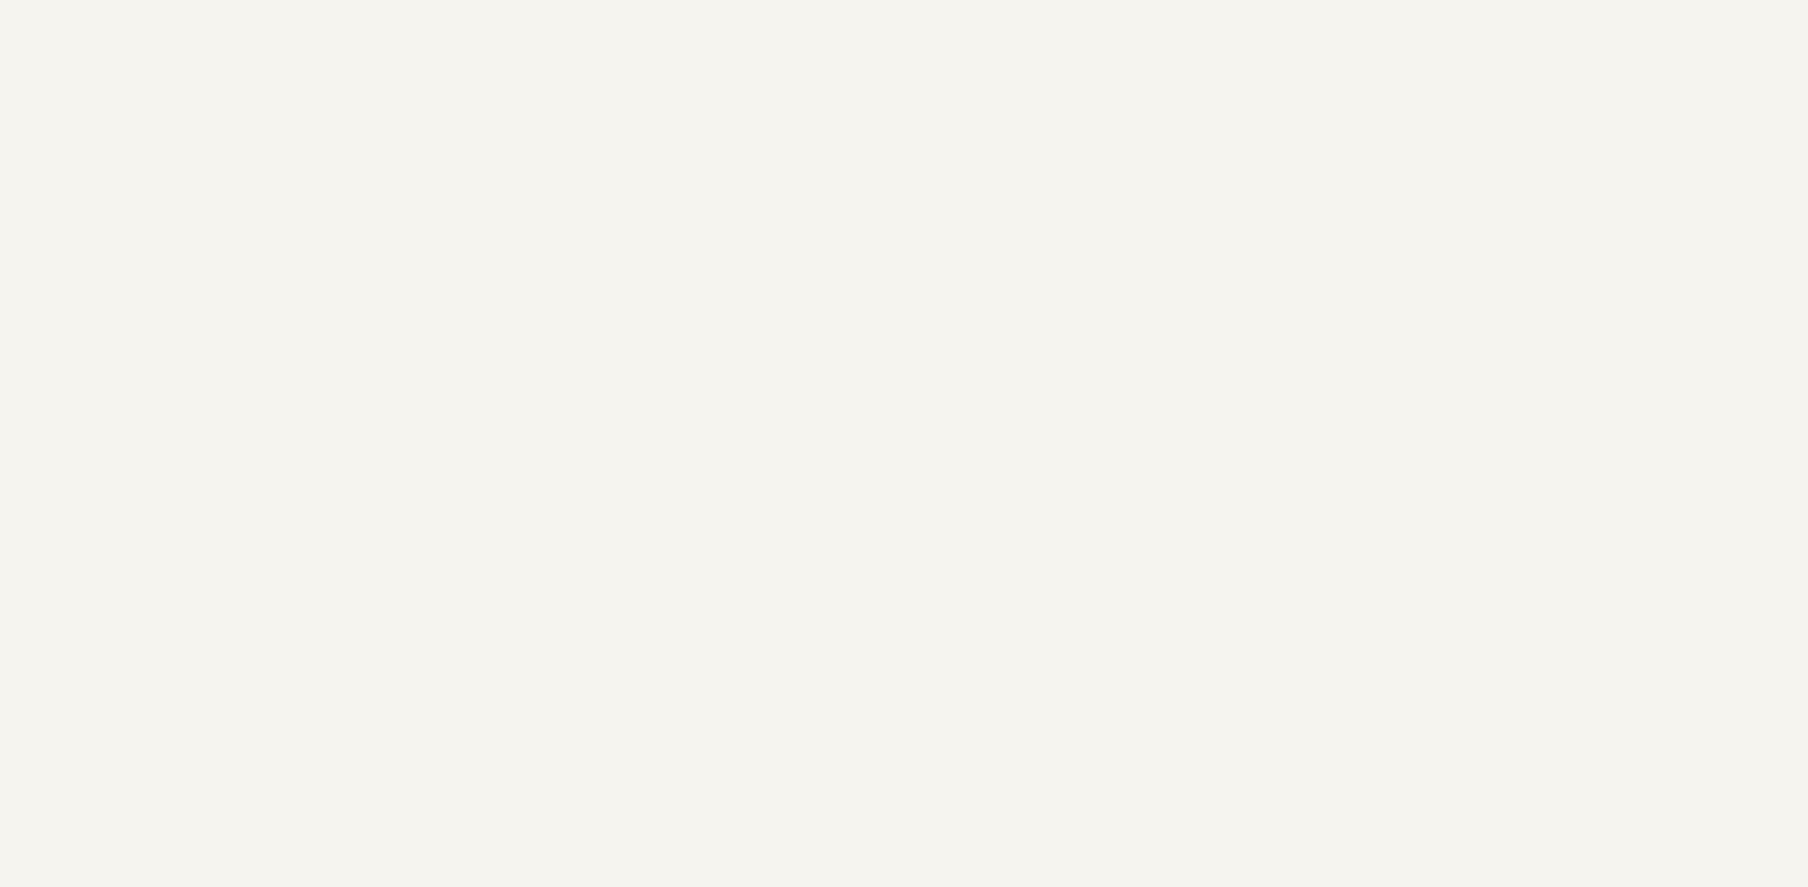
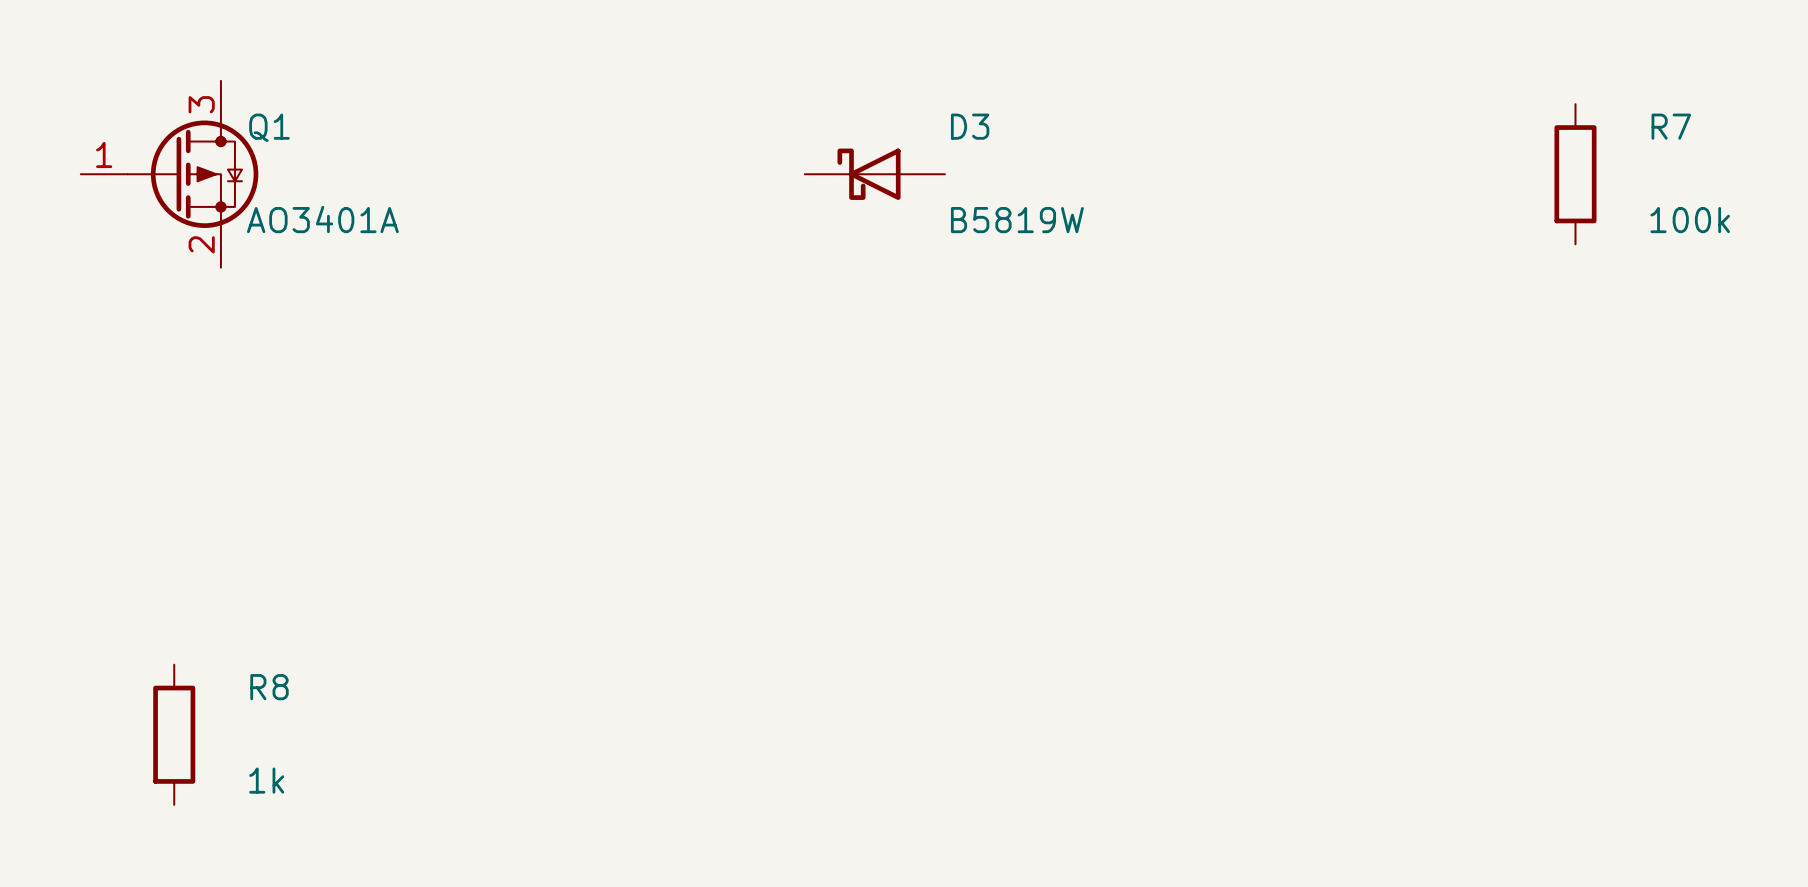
Q1: none -> AO3401A (169, 174)
D3: none -> B5819W (874, 174)
R7: none -> 100k (1575, 174)
R8: none -> 1k (174, 734)

